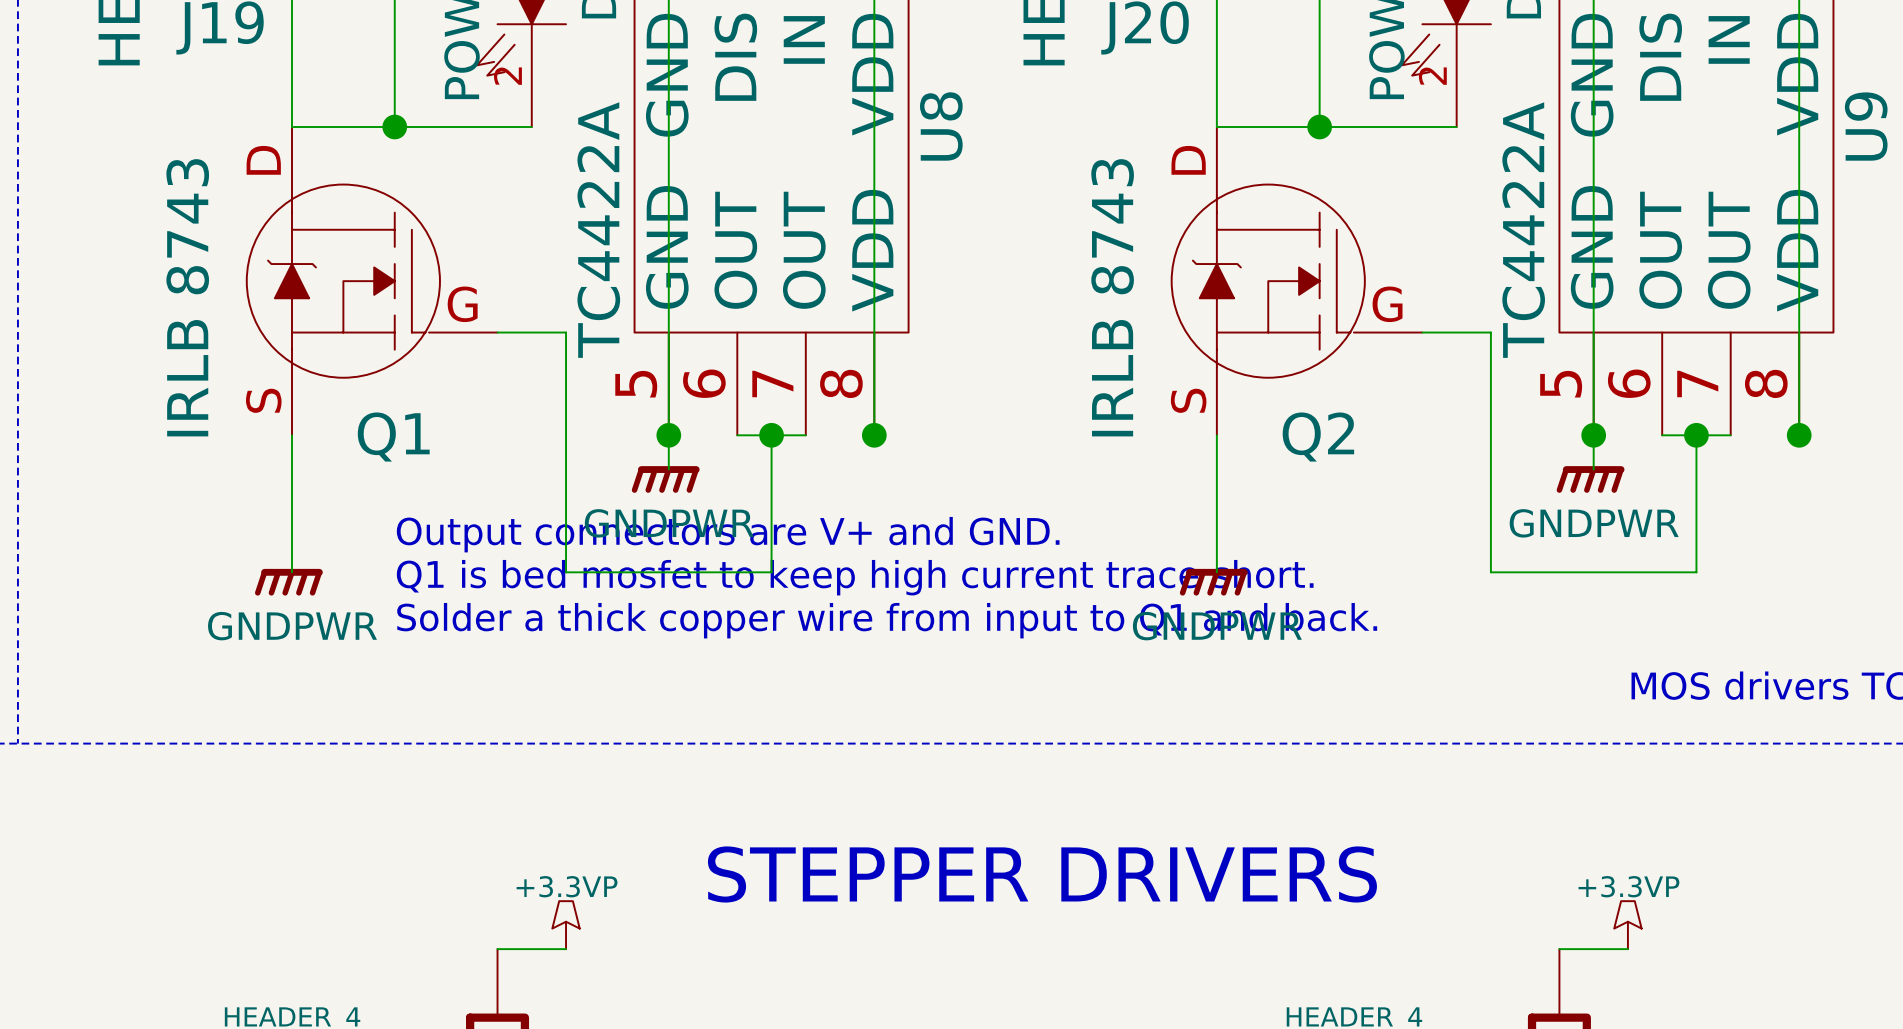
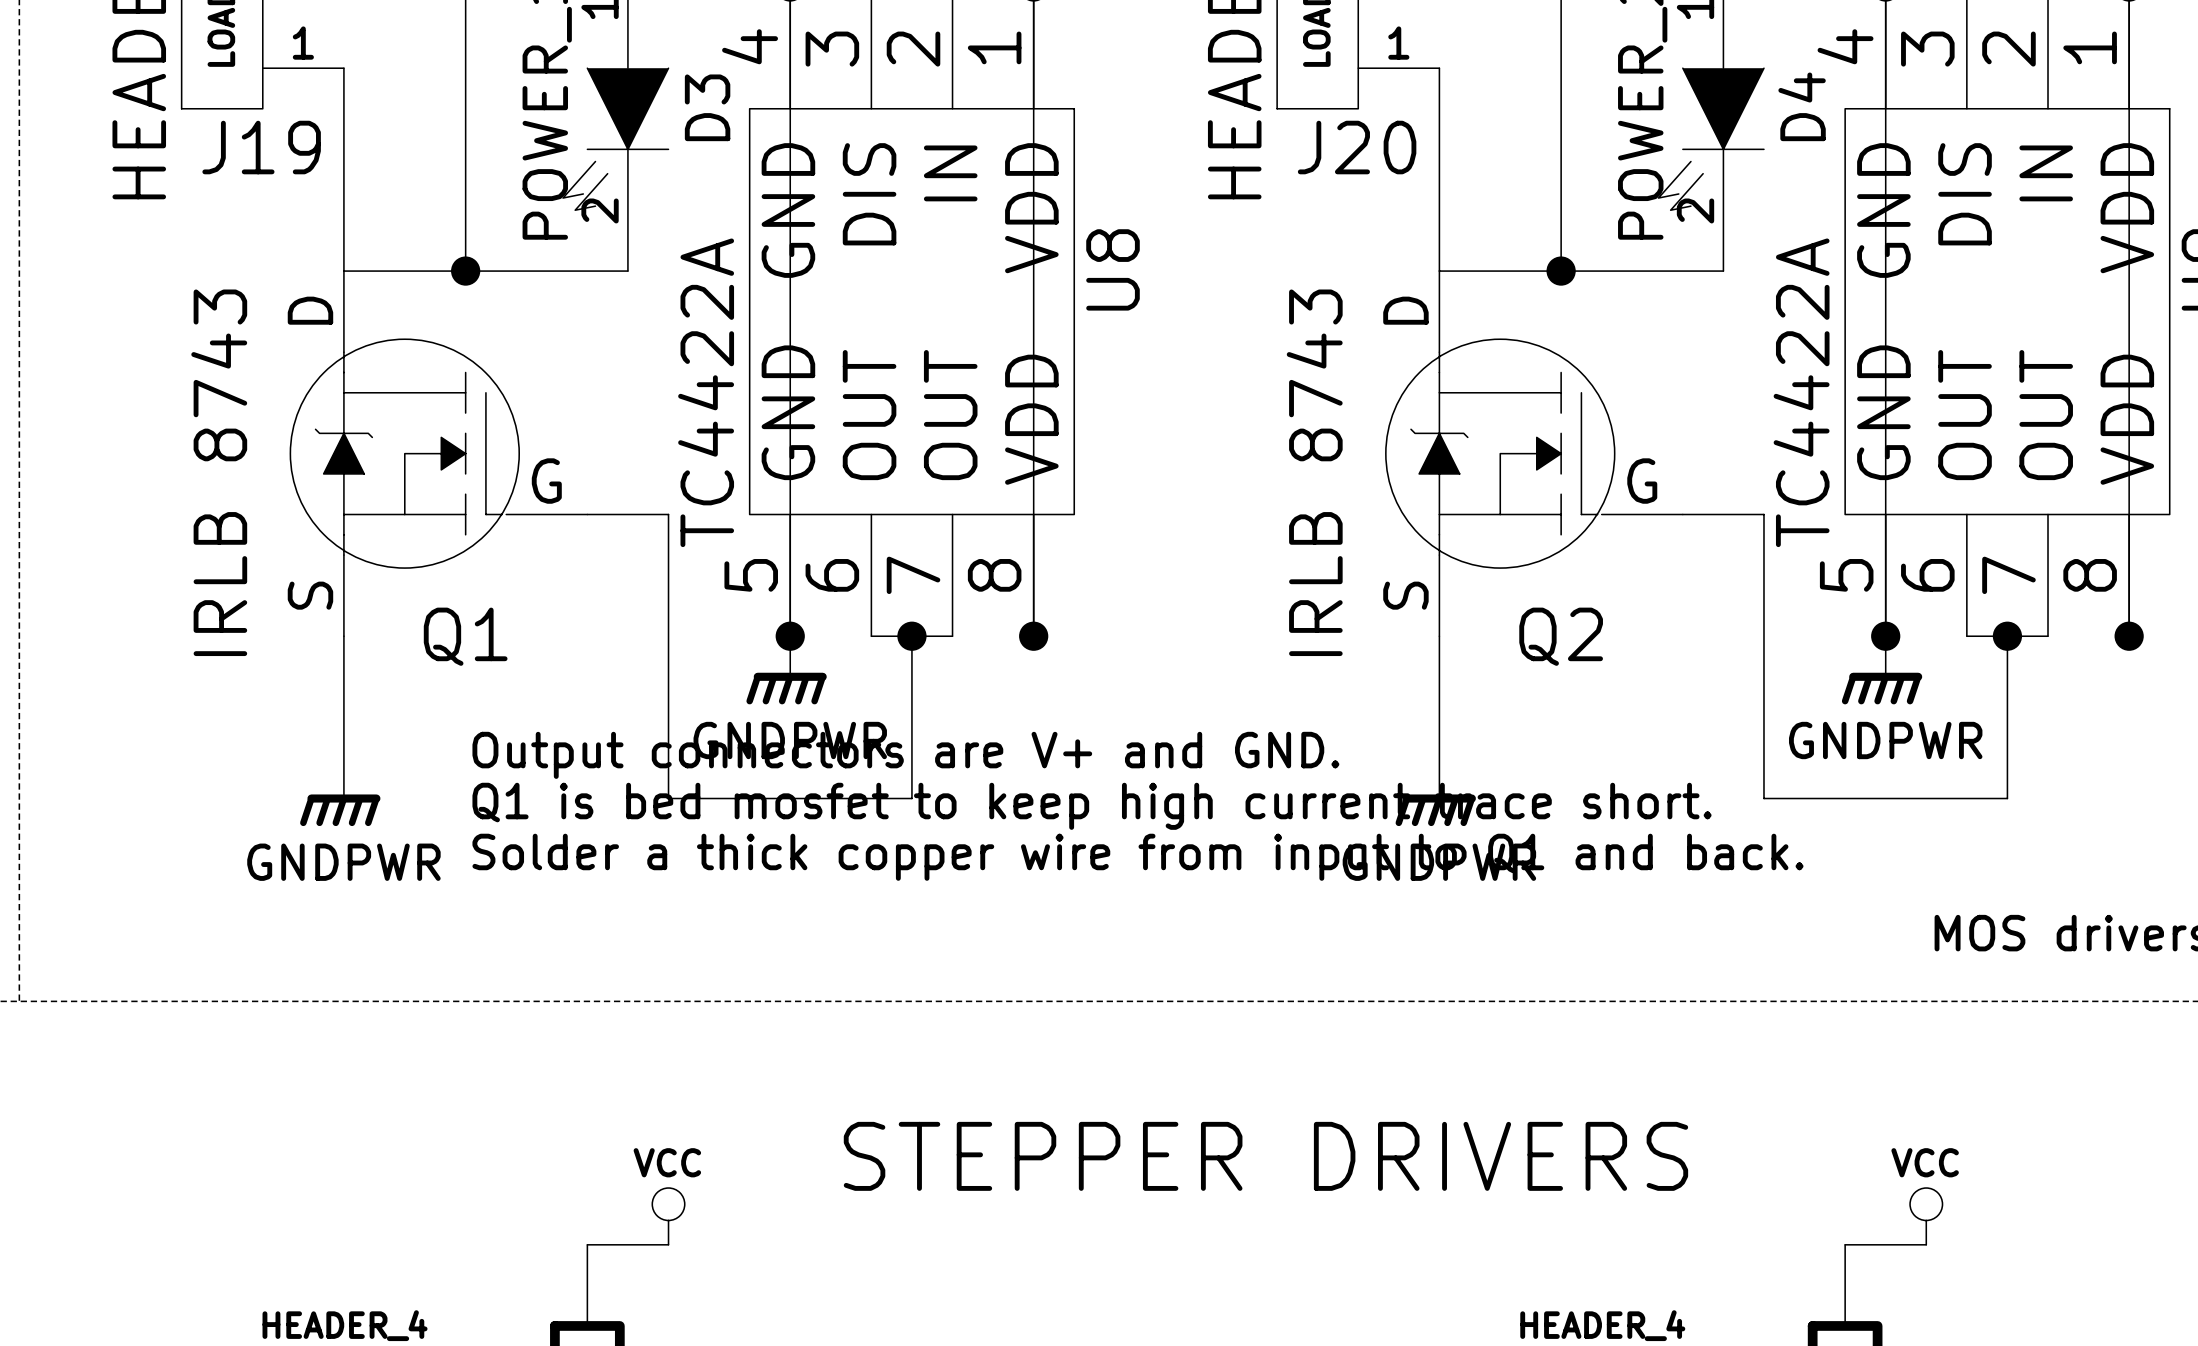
power symbol: +3.3VP (566, 925) -> VCC (668, 1216)
power symbol: +3.3VP (1627, 925) -> VCC (1926, 1216)

